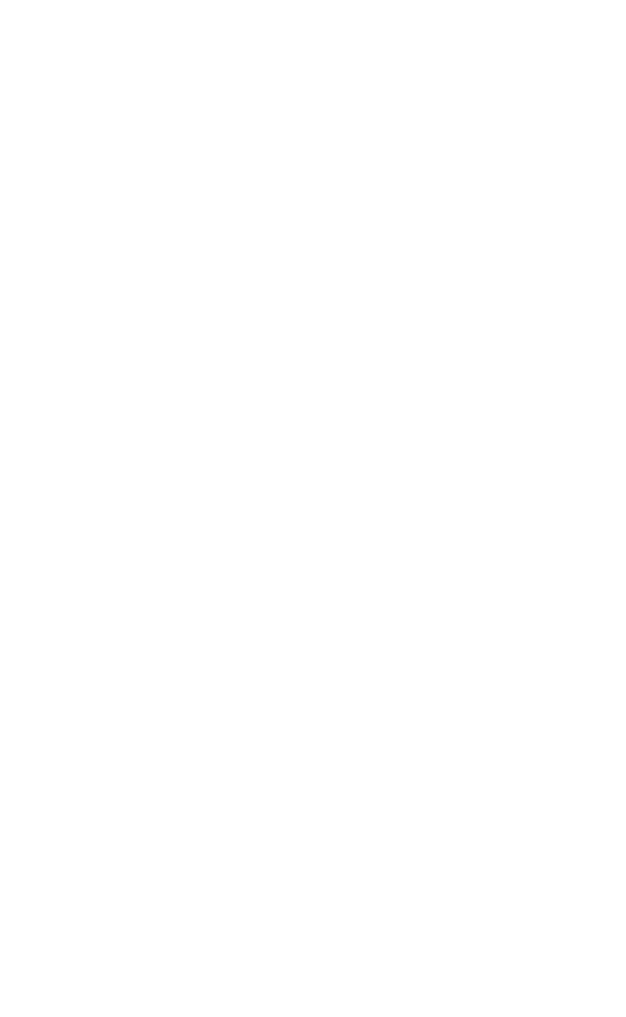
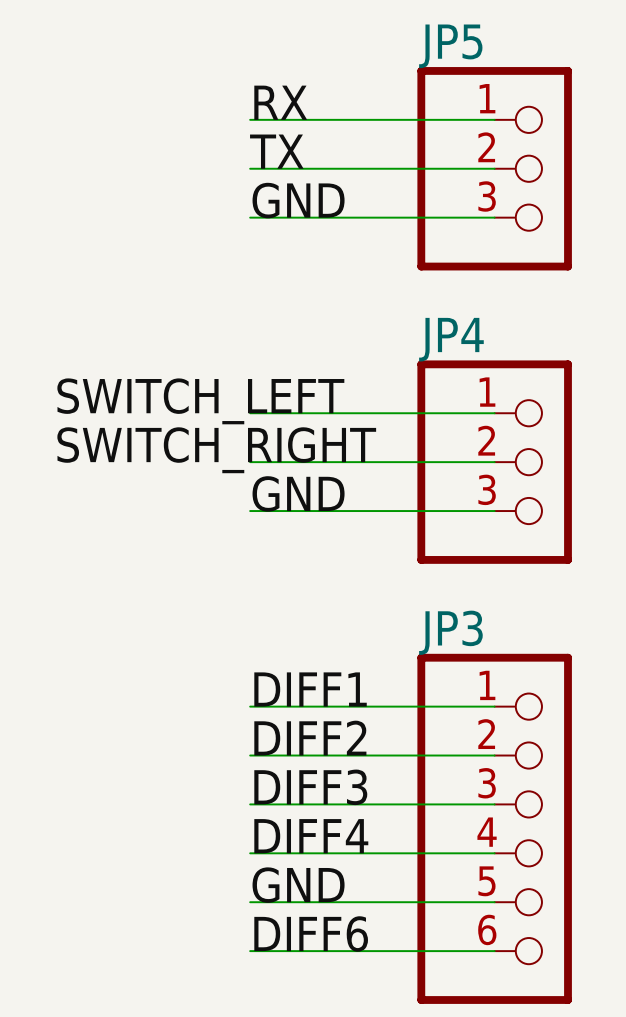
label: none -> RX (280, 102)
wire: none -> (250, 119) (494, 119)
label: none -> TX (276, 151)
wire: none -> (250, 168) (494, 168)
JP5: none -> (494, 168)
label: none -> GND (298, 200)
wire: none -> (250, 217) (494, 217)
label: none -> SWITCH_LEFT (200, 401)
wire: none -> (250, 413) (494, 413)
label: none -> SWITCH_RIGHT (216, 450)
wire: none -> (250, 462) (494, 462)
JP4: none -> (494, 462)
label: none -> GND (298, 493)
wire: none -> (250, 511) (494, 511)
label: none -> DIFF1 (310, 689)
wire: none -> (250, 706) (494, 706)
label: none -> DIFF2 (310, 738)
wire: none -> (250, 755) (494, 755)
label: none -> DIFF3 (310, 787)
wire: none -> (250, 804) (494, 804)
JP3: none -> (494, 828)
label: none -> DIFF4 (311, 836)
wire: none -> (250, 853) (494, 853)
label: none -> GND (298, 885)
wire: none -> (250, 902) (494, 902)
label: none -> DIFF6 (311, 934)
wire: none -> (250, 951) (494, 951)

